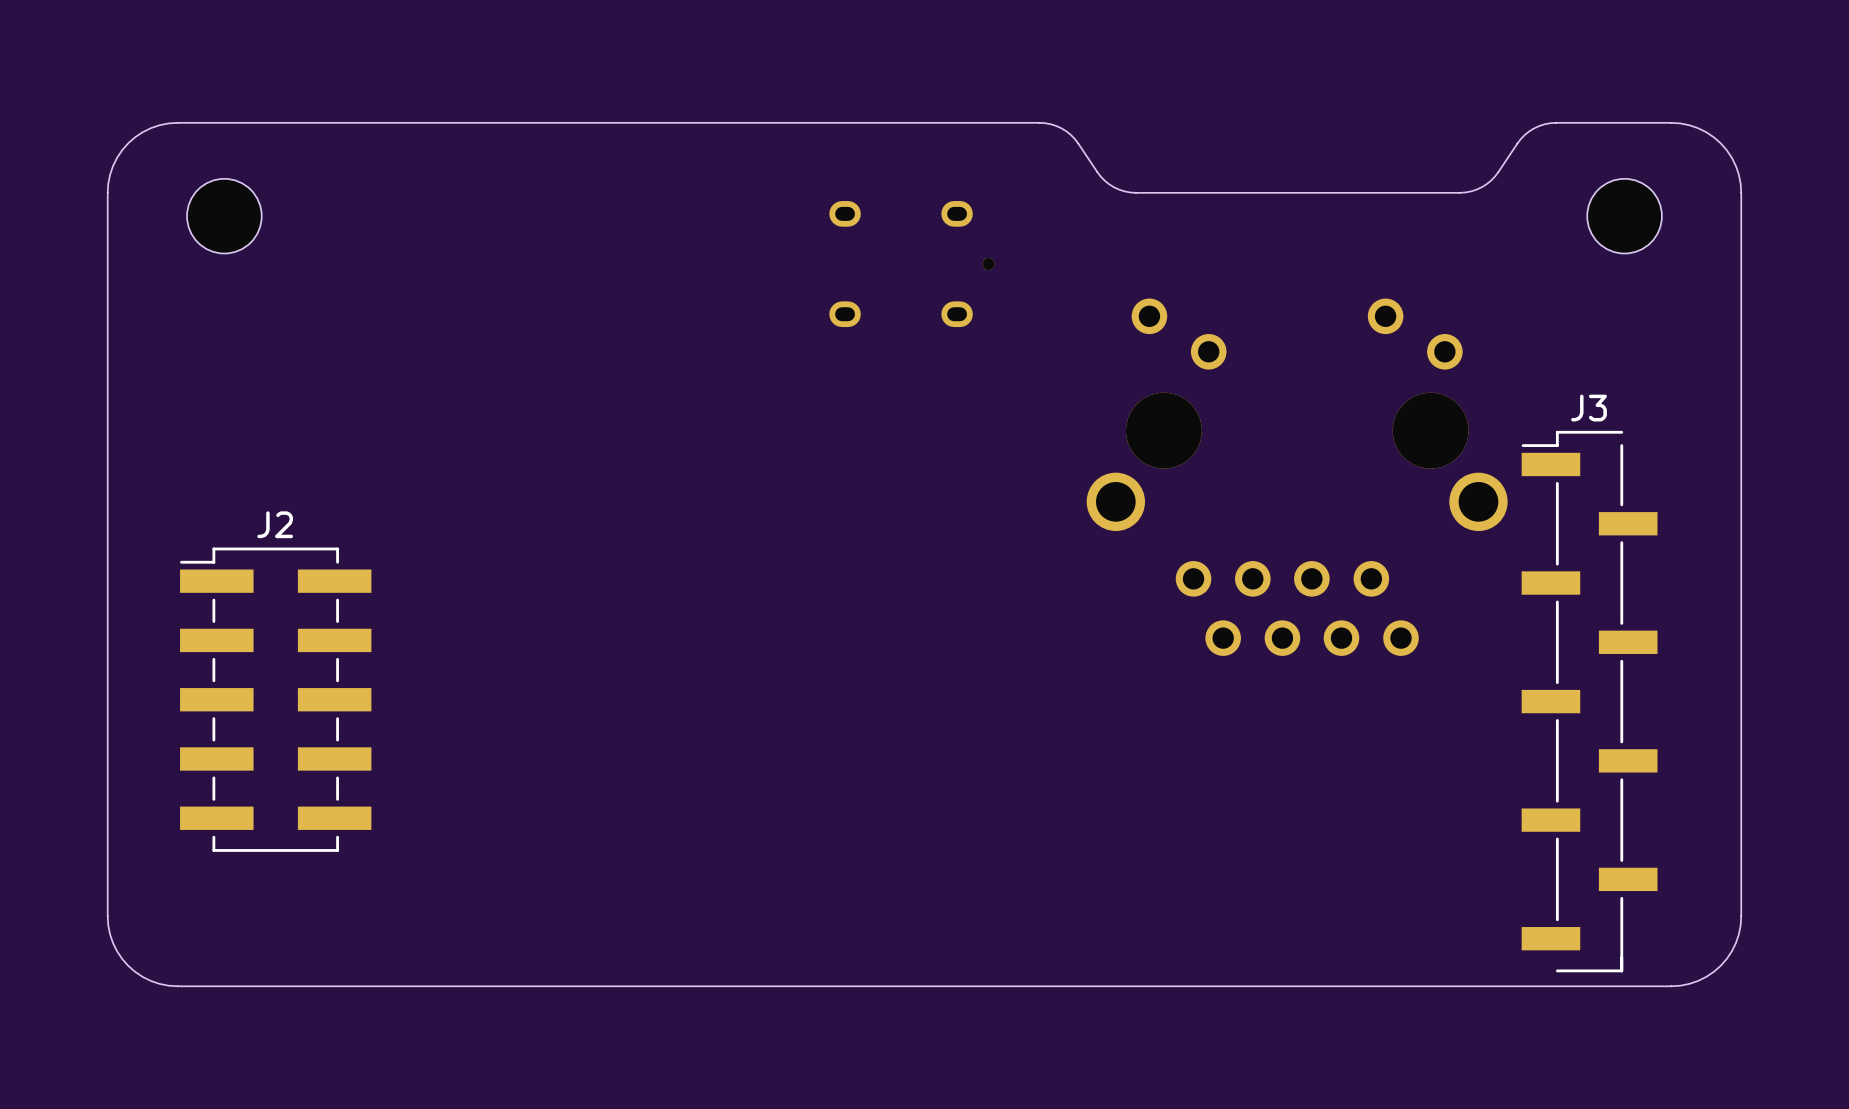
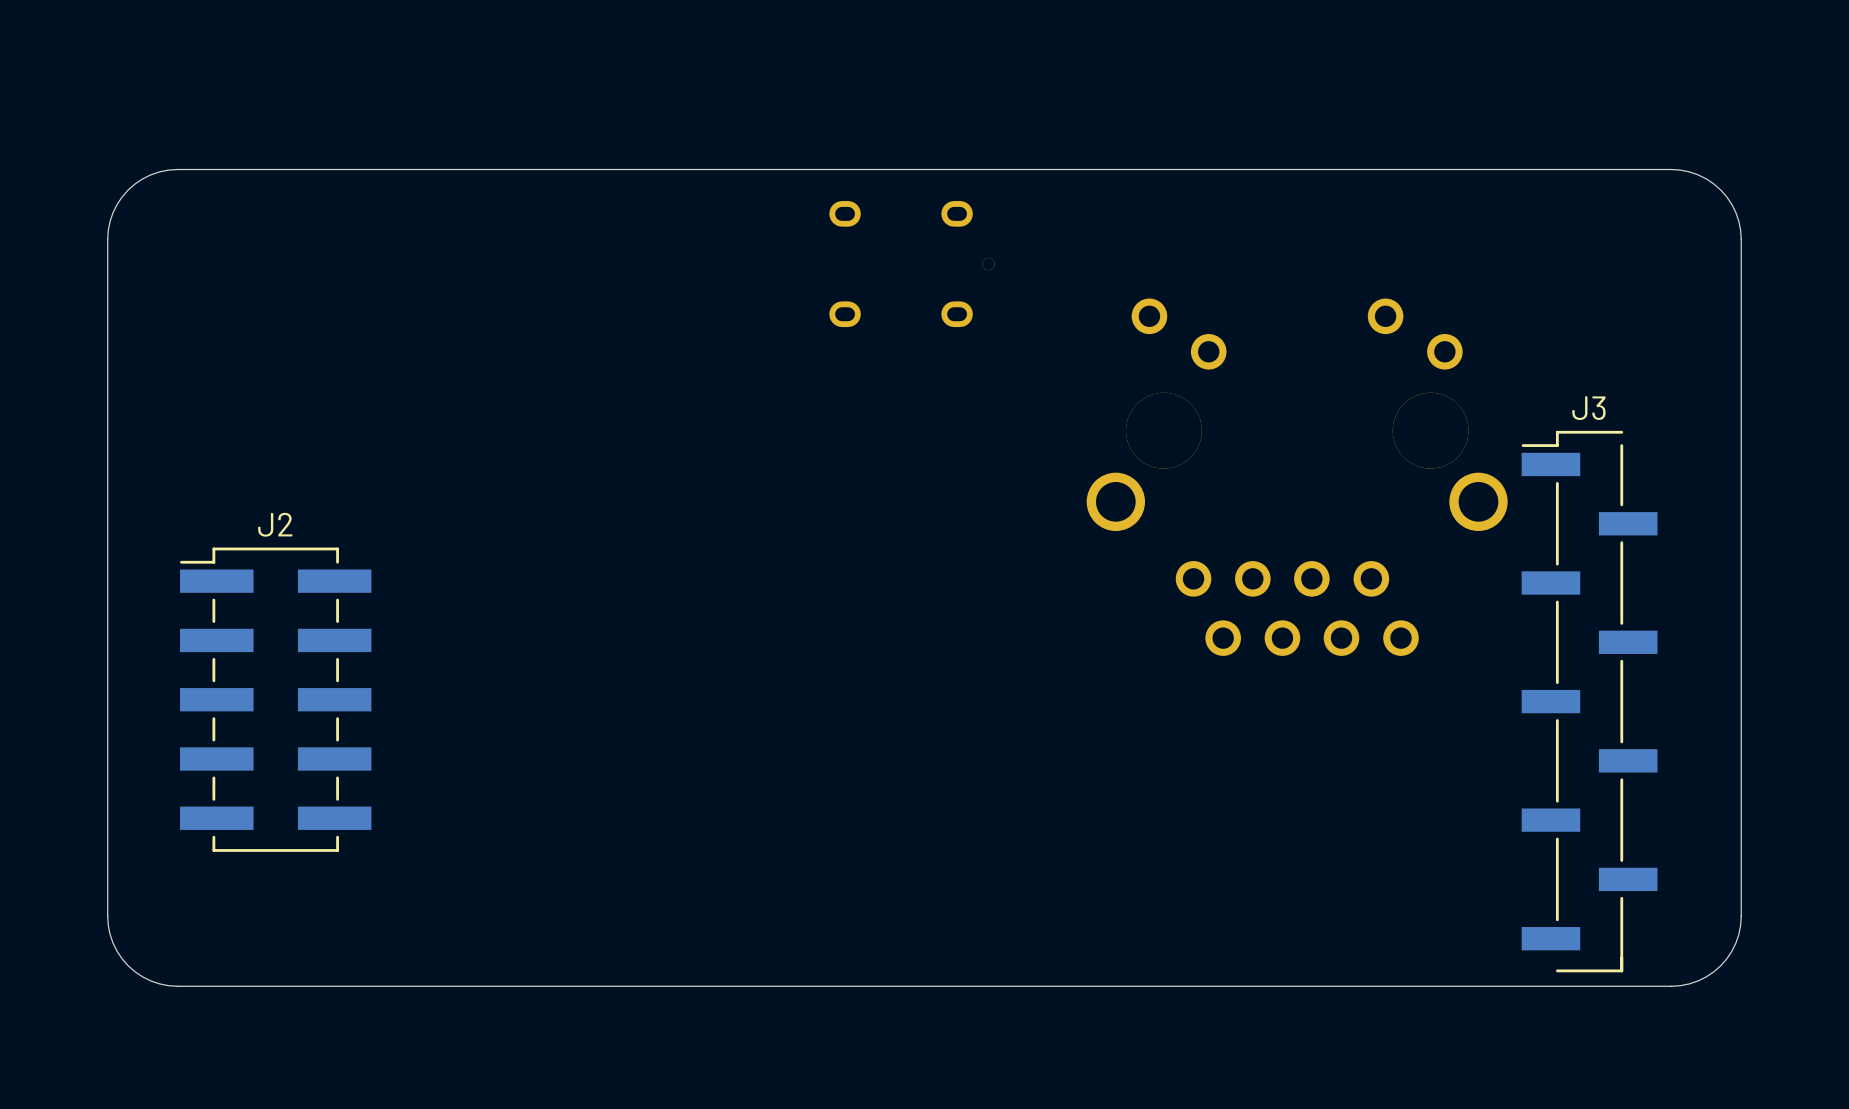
part: (224, 216) -> none
part: (1624, 216) -> none
board edge: (1741, 239) (1740, 183) (1731, 157) (1720, 143) (1706, 132) (1689, 125) (1671, 122) (1556, 122) (1539, 125) (1520, 139) (1490, 180) (1476, 189) (1459, 192) (1130, 192) (1119, 189) (1104, 180) (1074, 139) (1066, 131) (1050, 124) (1039, 122) (168, 123) (142, 132) (128, 143) (117, 157) (108, 183) (107, 239) -> (1741, 239) (1735, 212) (1720, 190) (1698, 174) (1671, 169) (177, 169) (150, 174) (128, 190) (113, 212) (107, 239)

